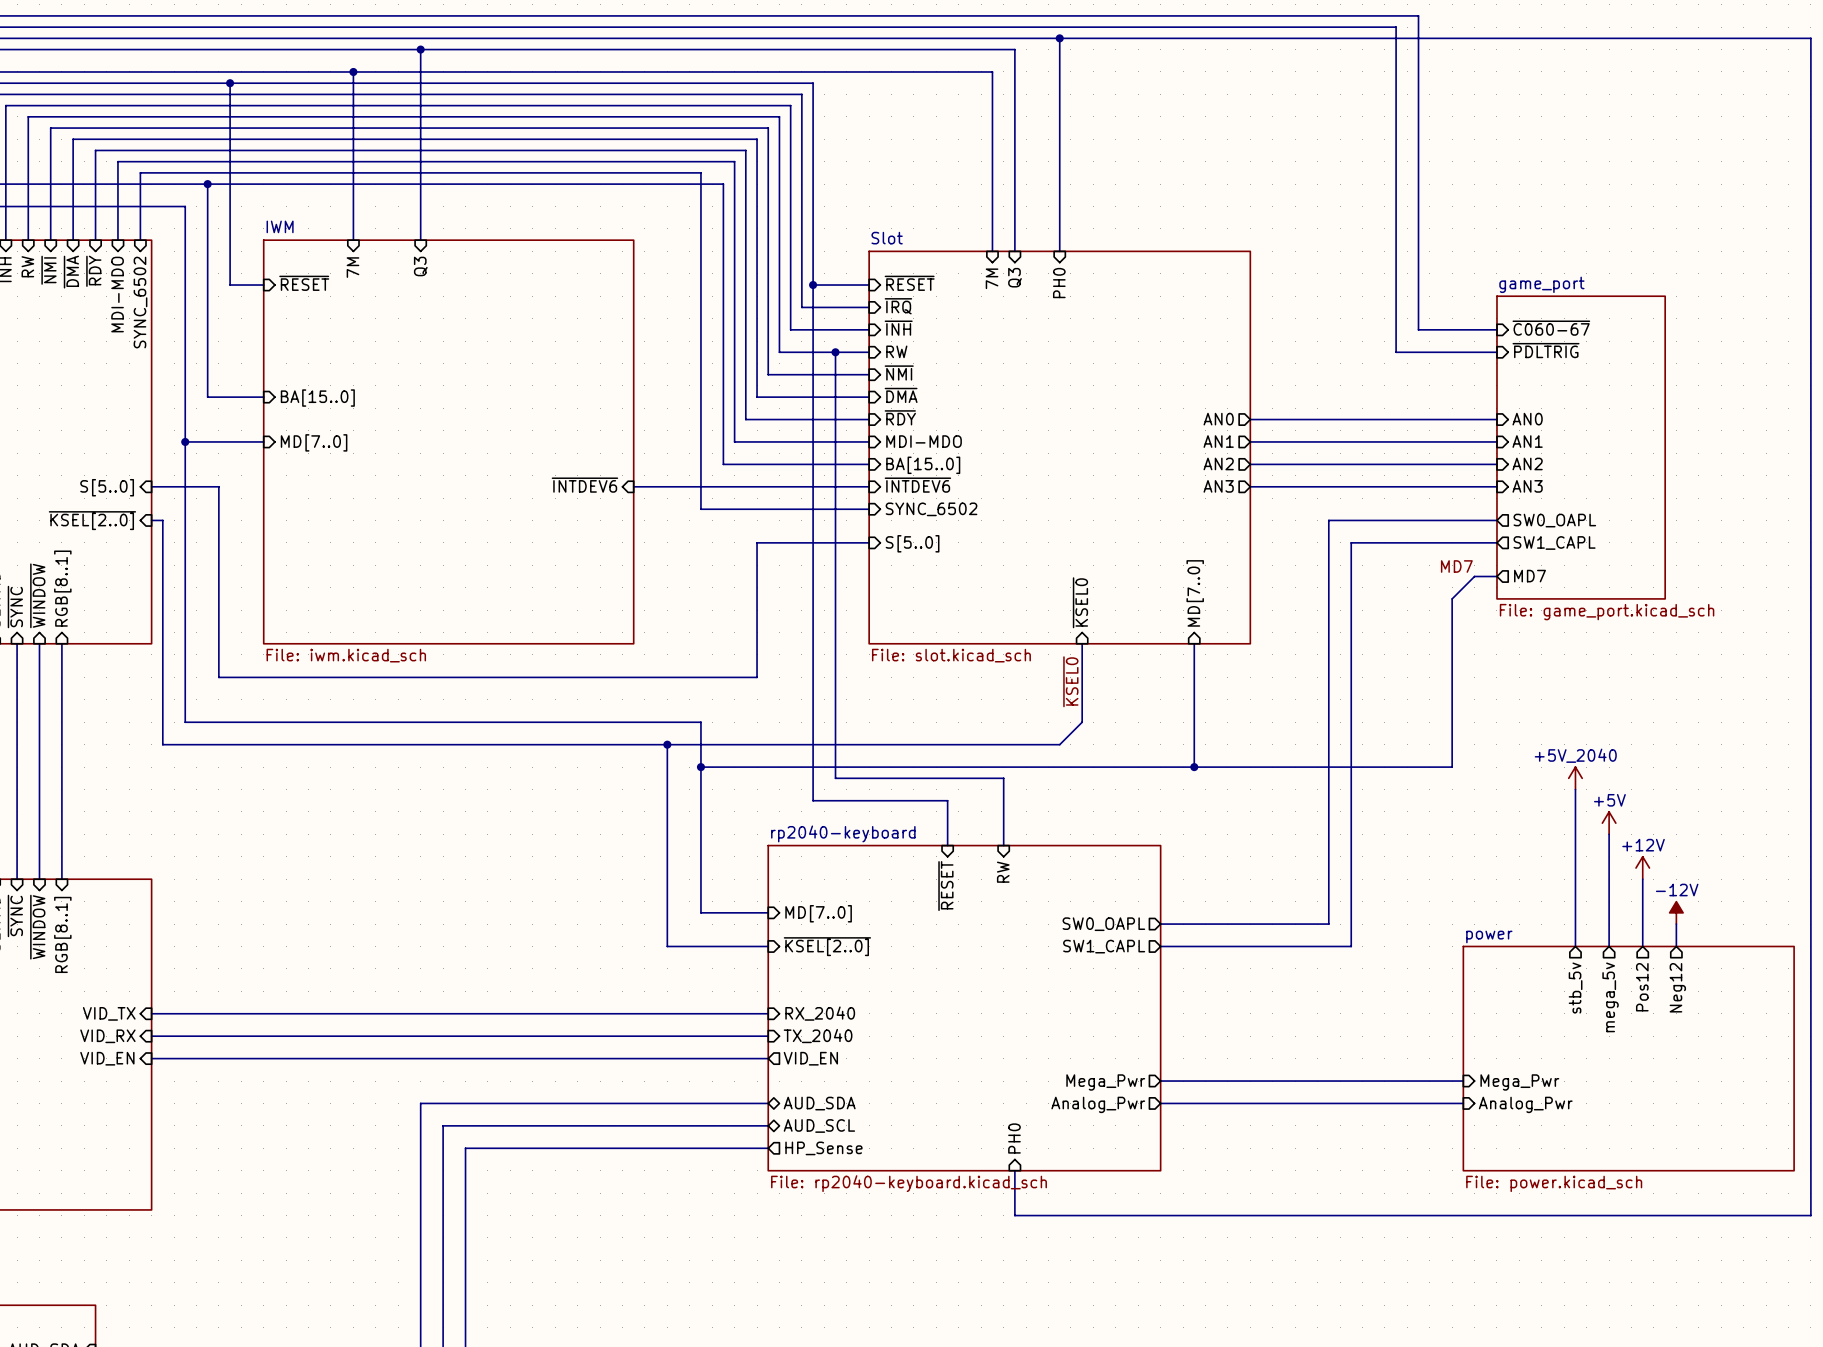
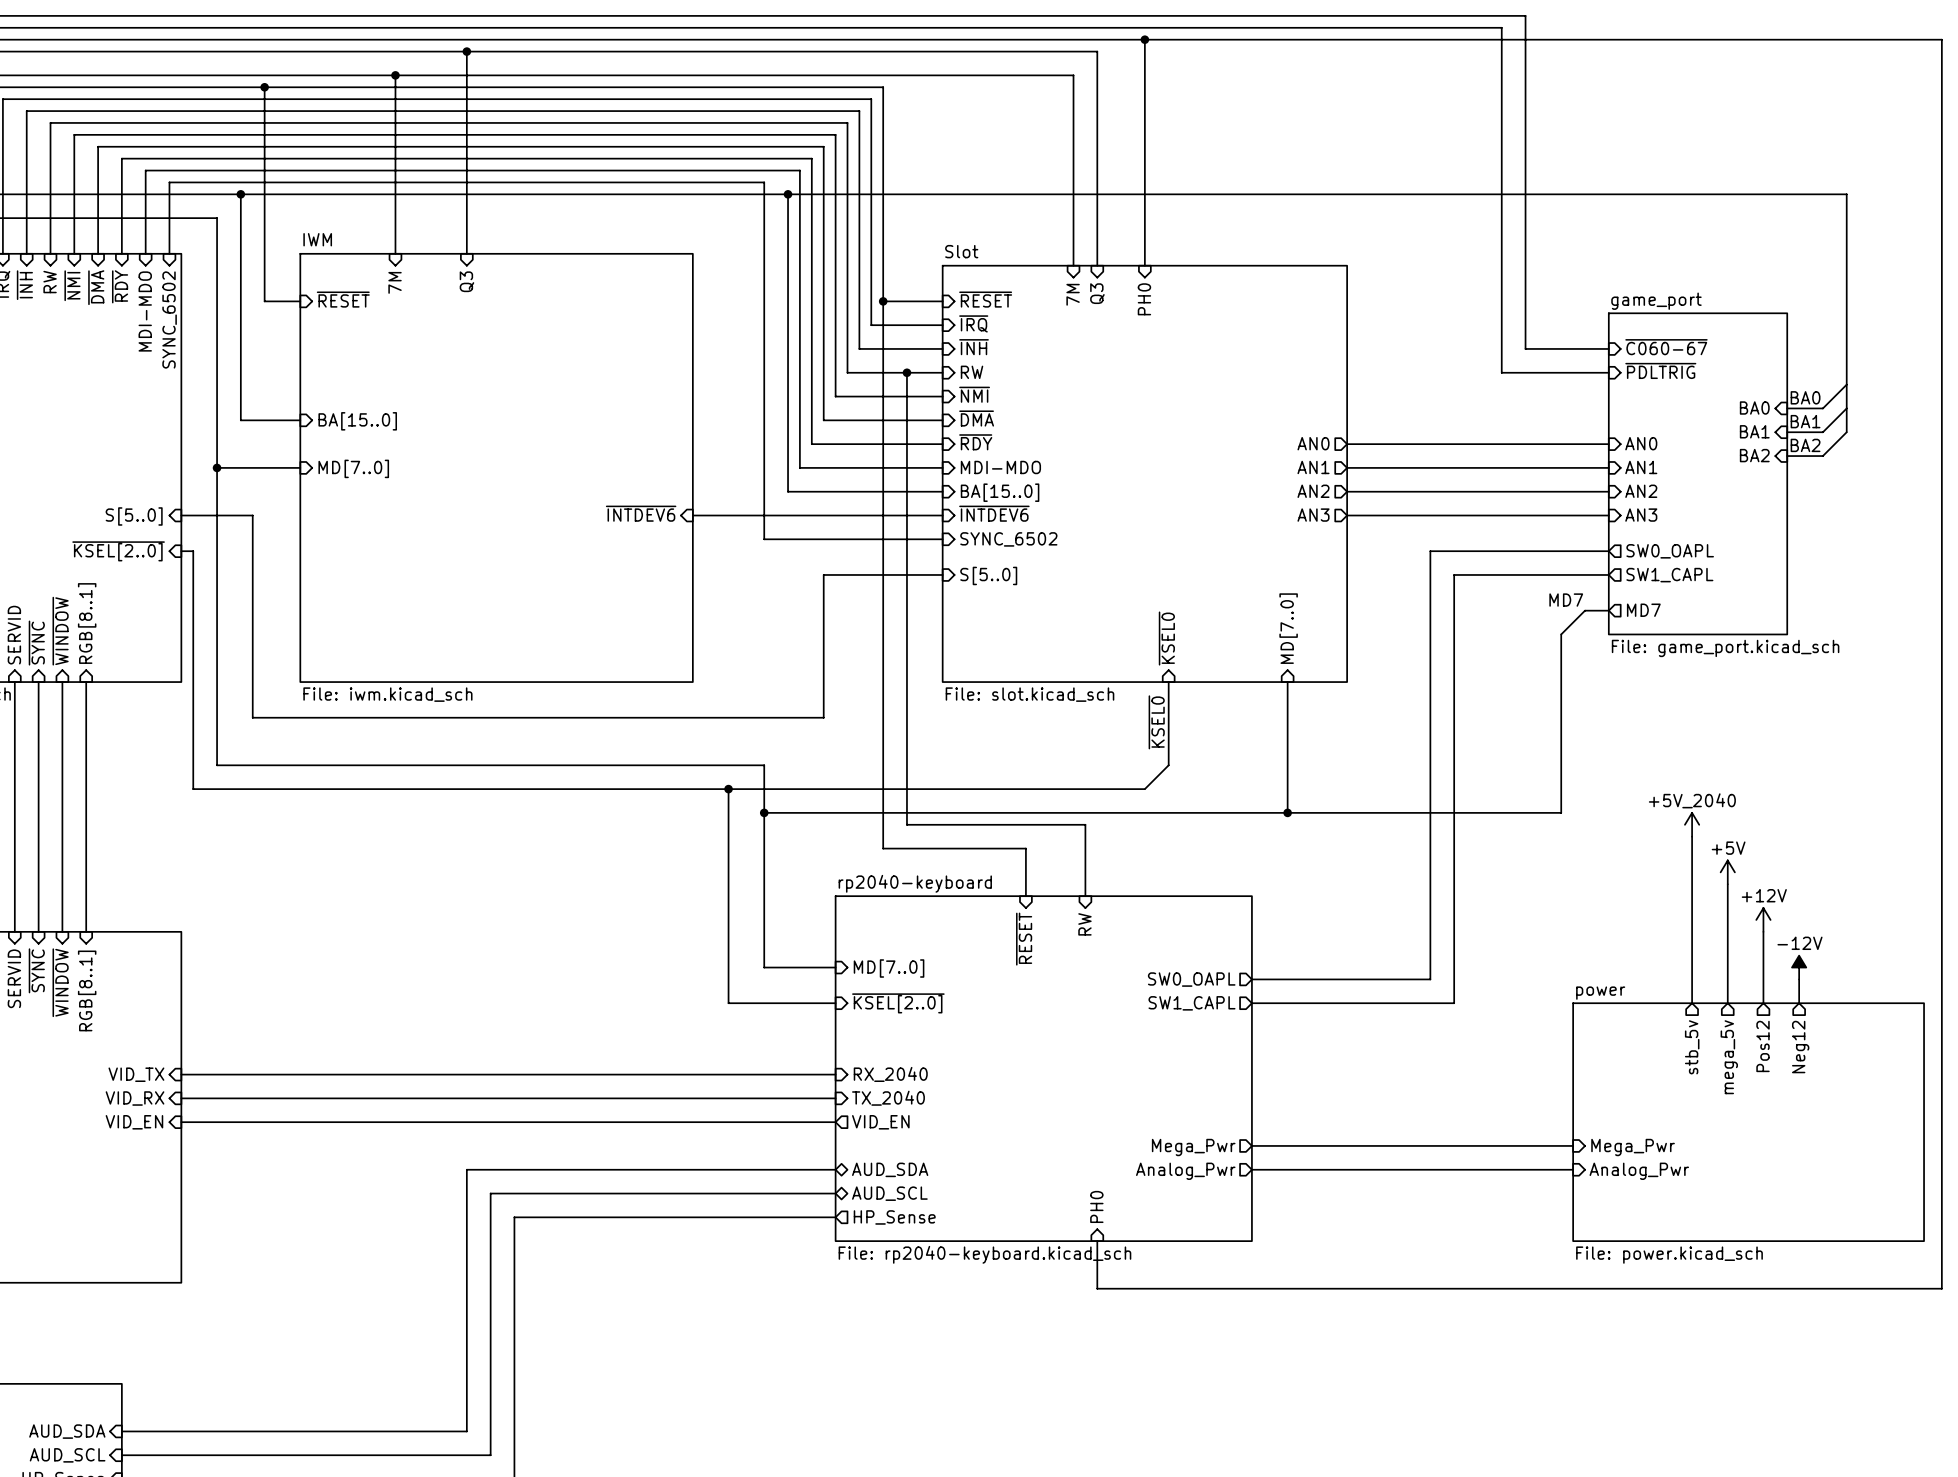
bus: none -> (788, 194) (1846, 194) (1846, 432)
junction: none -> (788, 194)
wire: none -> (1846, 384) (1822, 408) (1787, 408)
label: none -> BA0 (1805, 397)
sheet pin: none -> BA0 (1754, 408)
wire: none -> (1846, 408) (1822, 432) (1787, 432)
label: none -> BA1 (1805, 421)
sheet pin: none -> BA1 (1754, 431)
wire: none -> (1846, 432) (1822, 456) (1787, 456)
label: none -> BA2 (1805, 445)
sheet pin: none -> BA2 (1754, 455)

